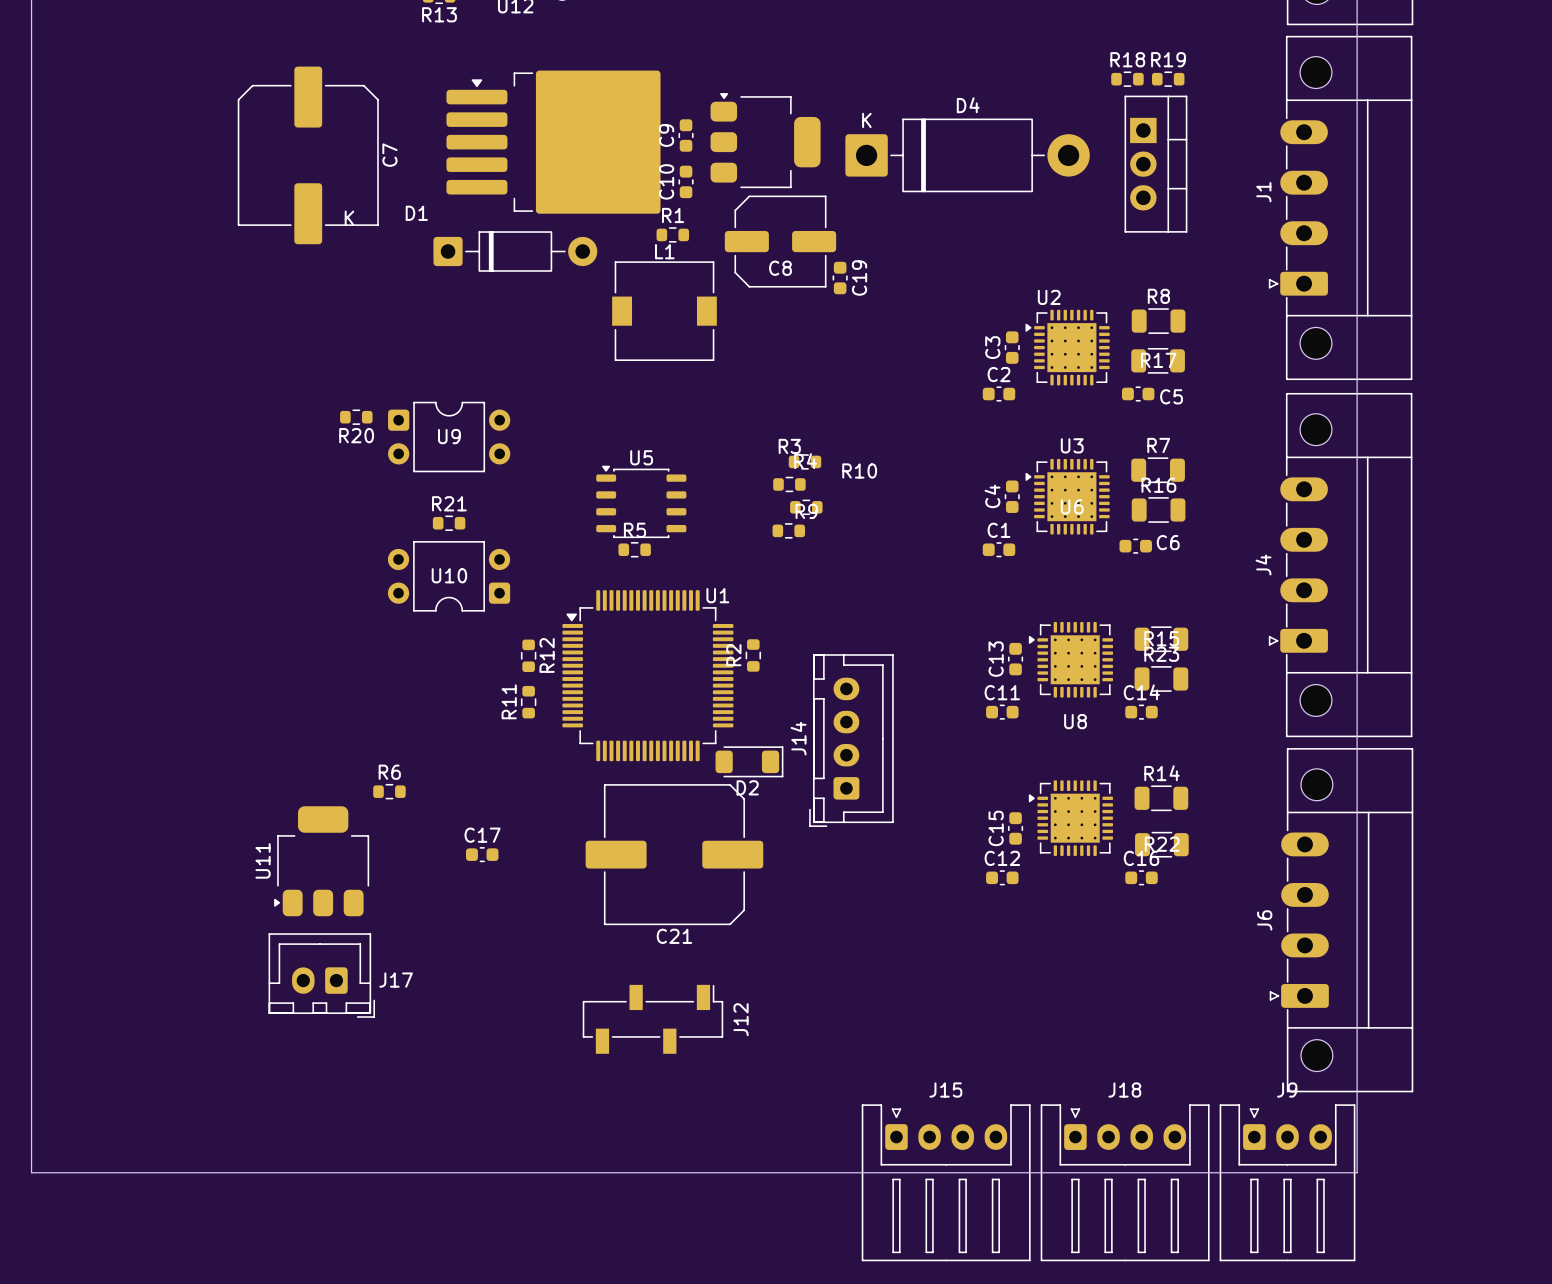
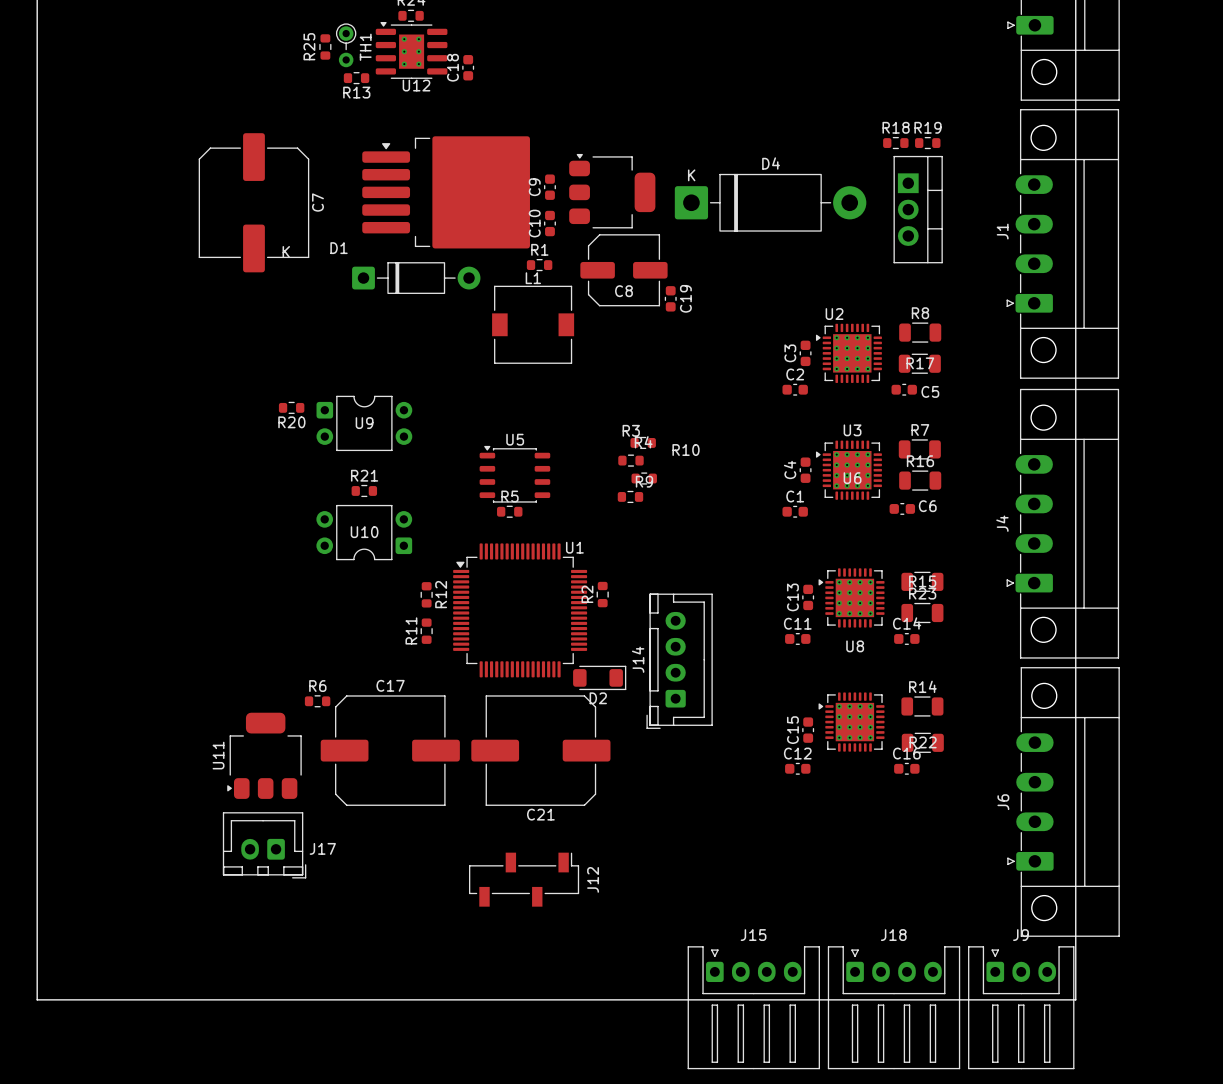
C17 name position: C17 (482, 835) -> C17 (390, 685)
C17 footprint: [466, 847, 499, 863] -> [320, 695, 460, 806]

